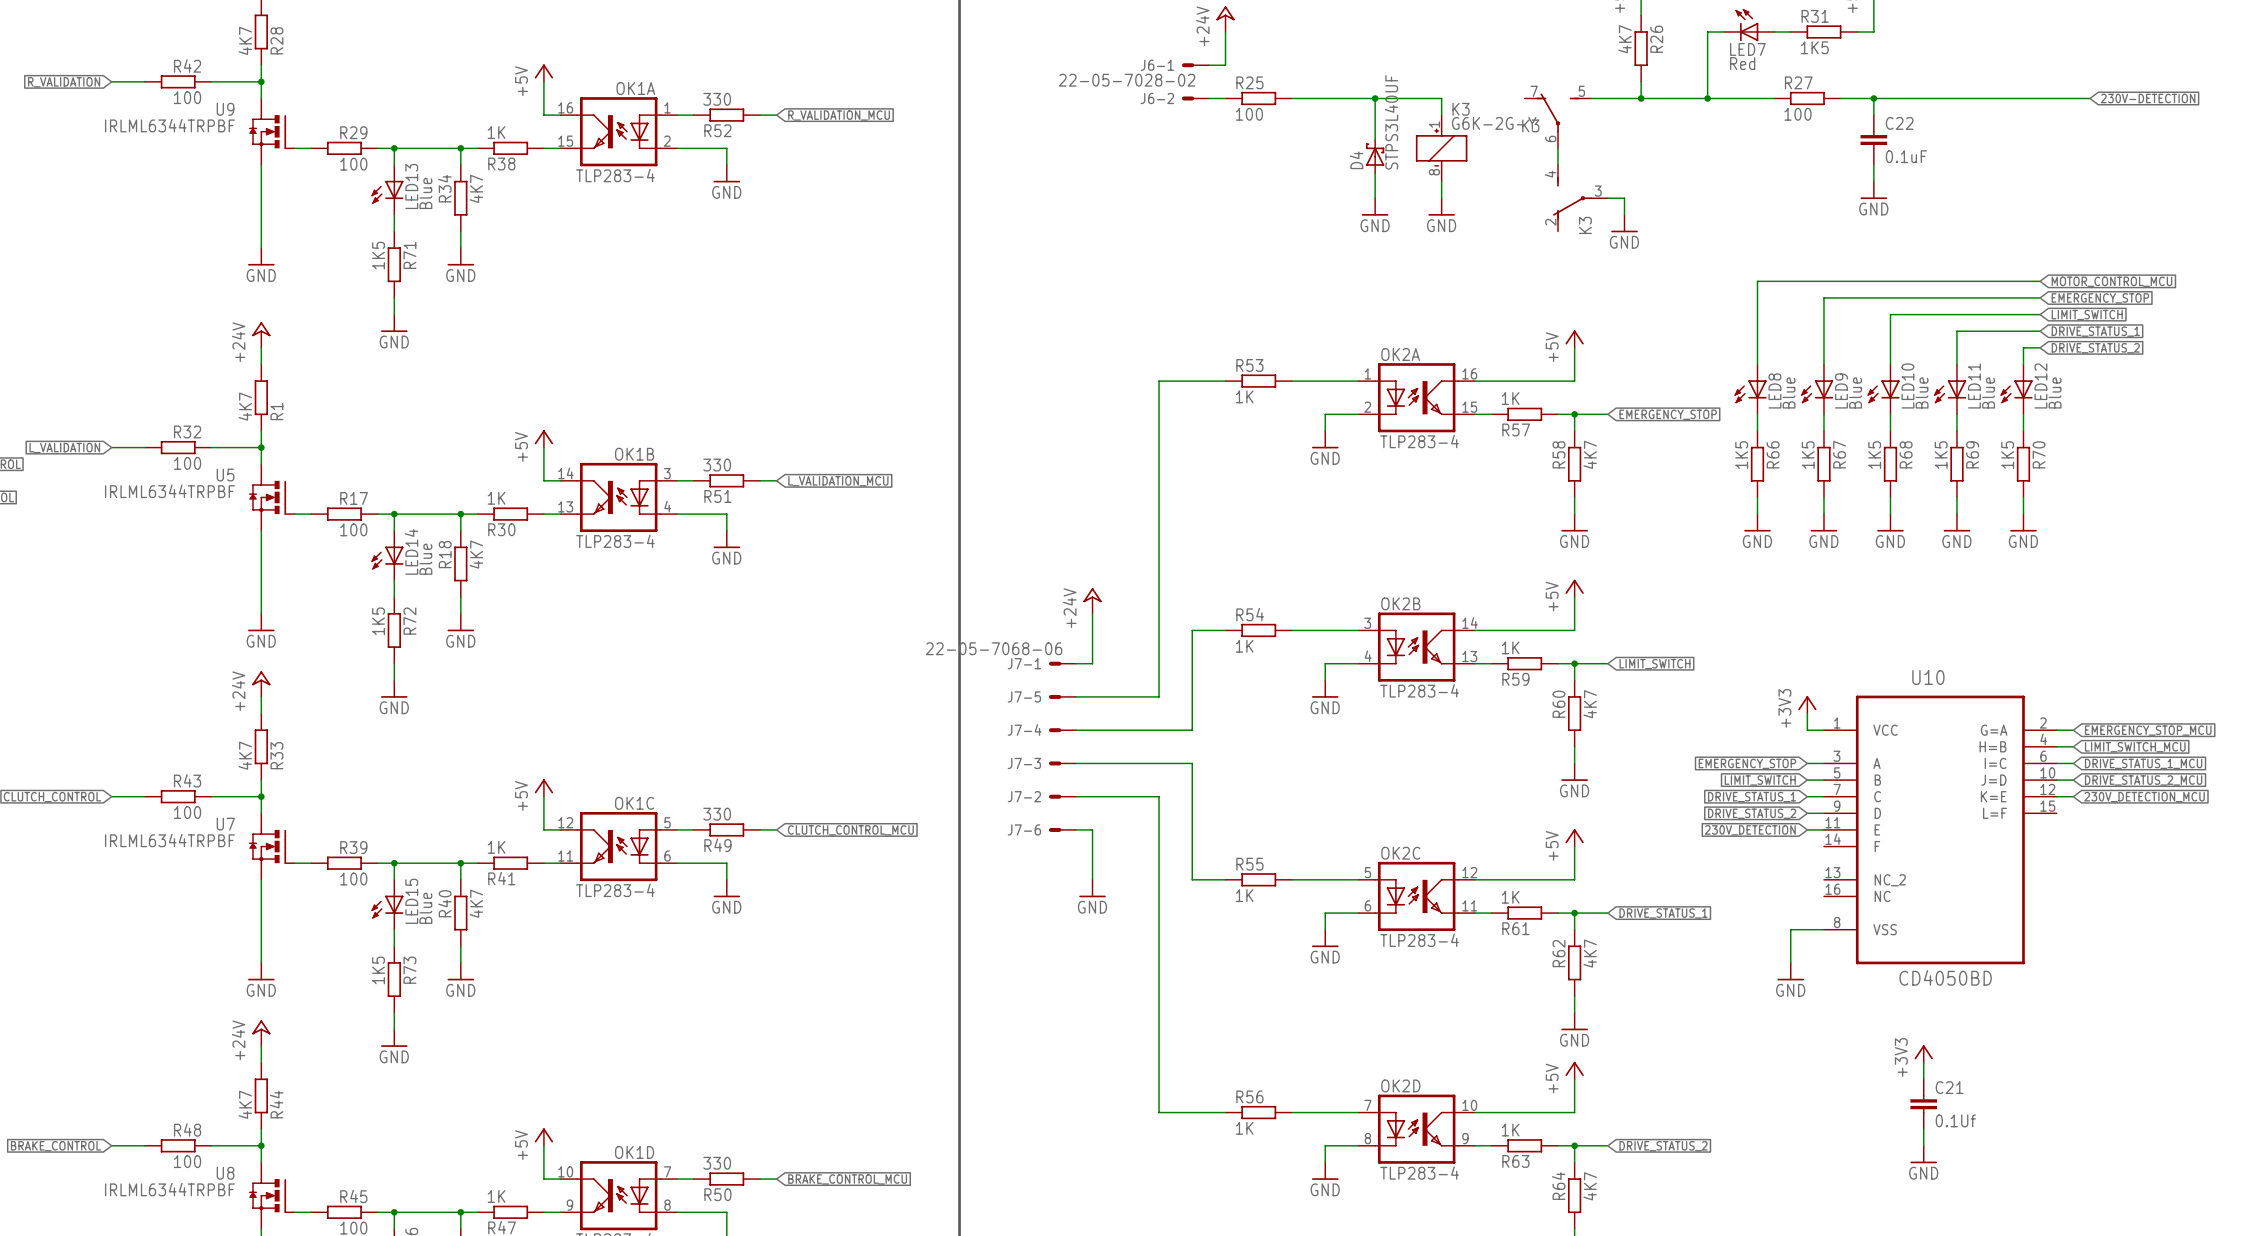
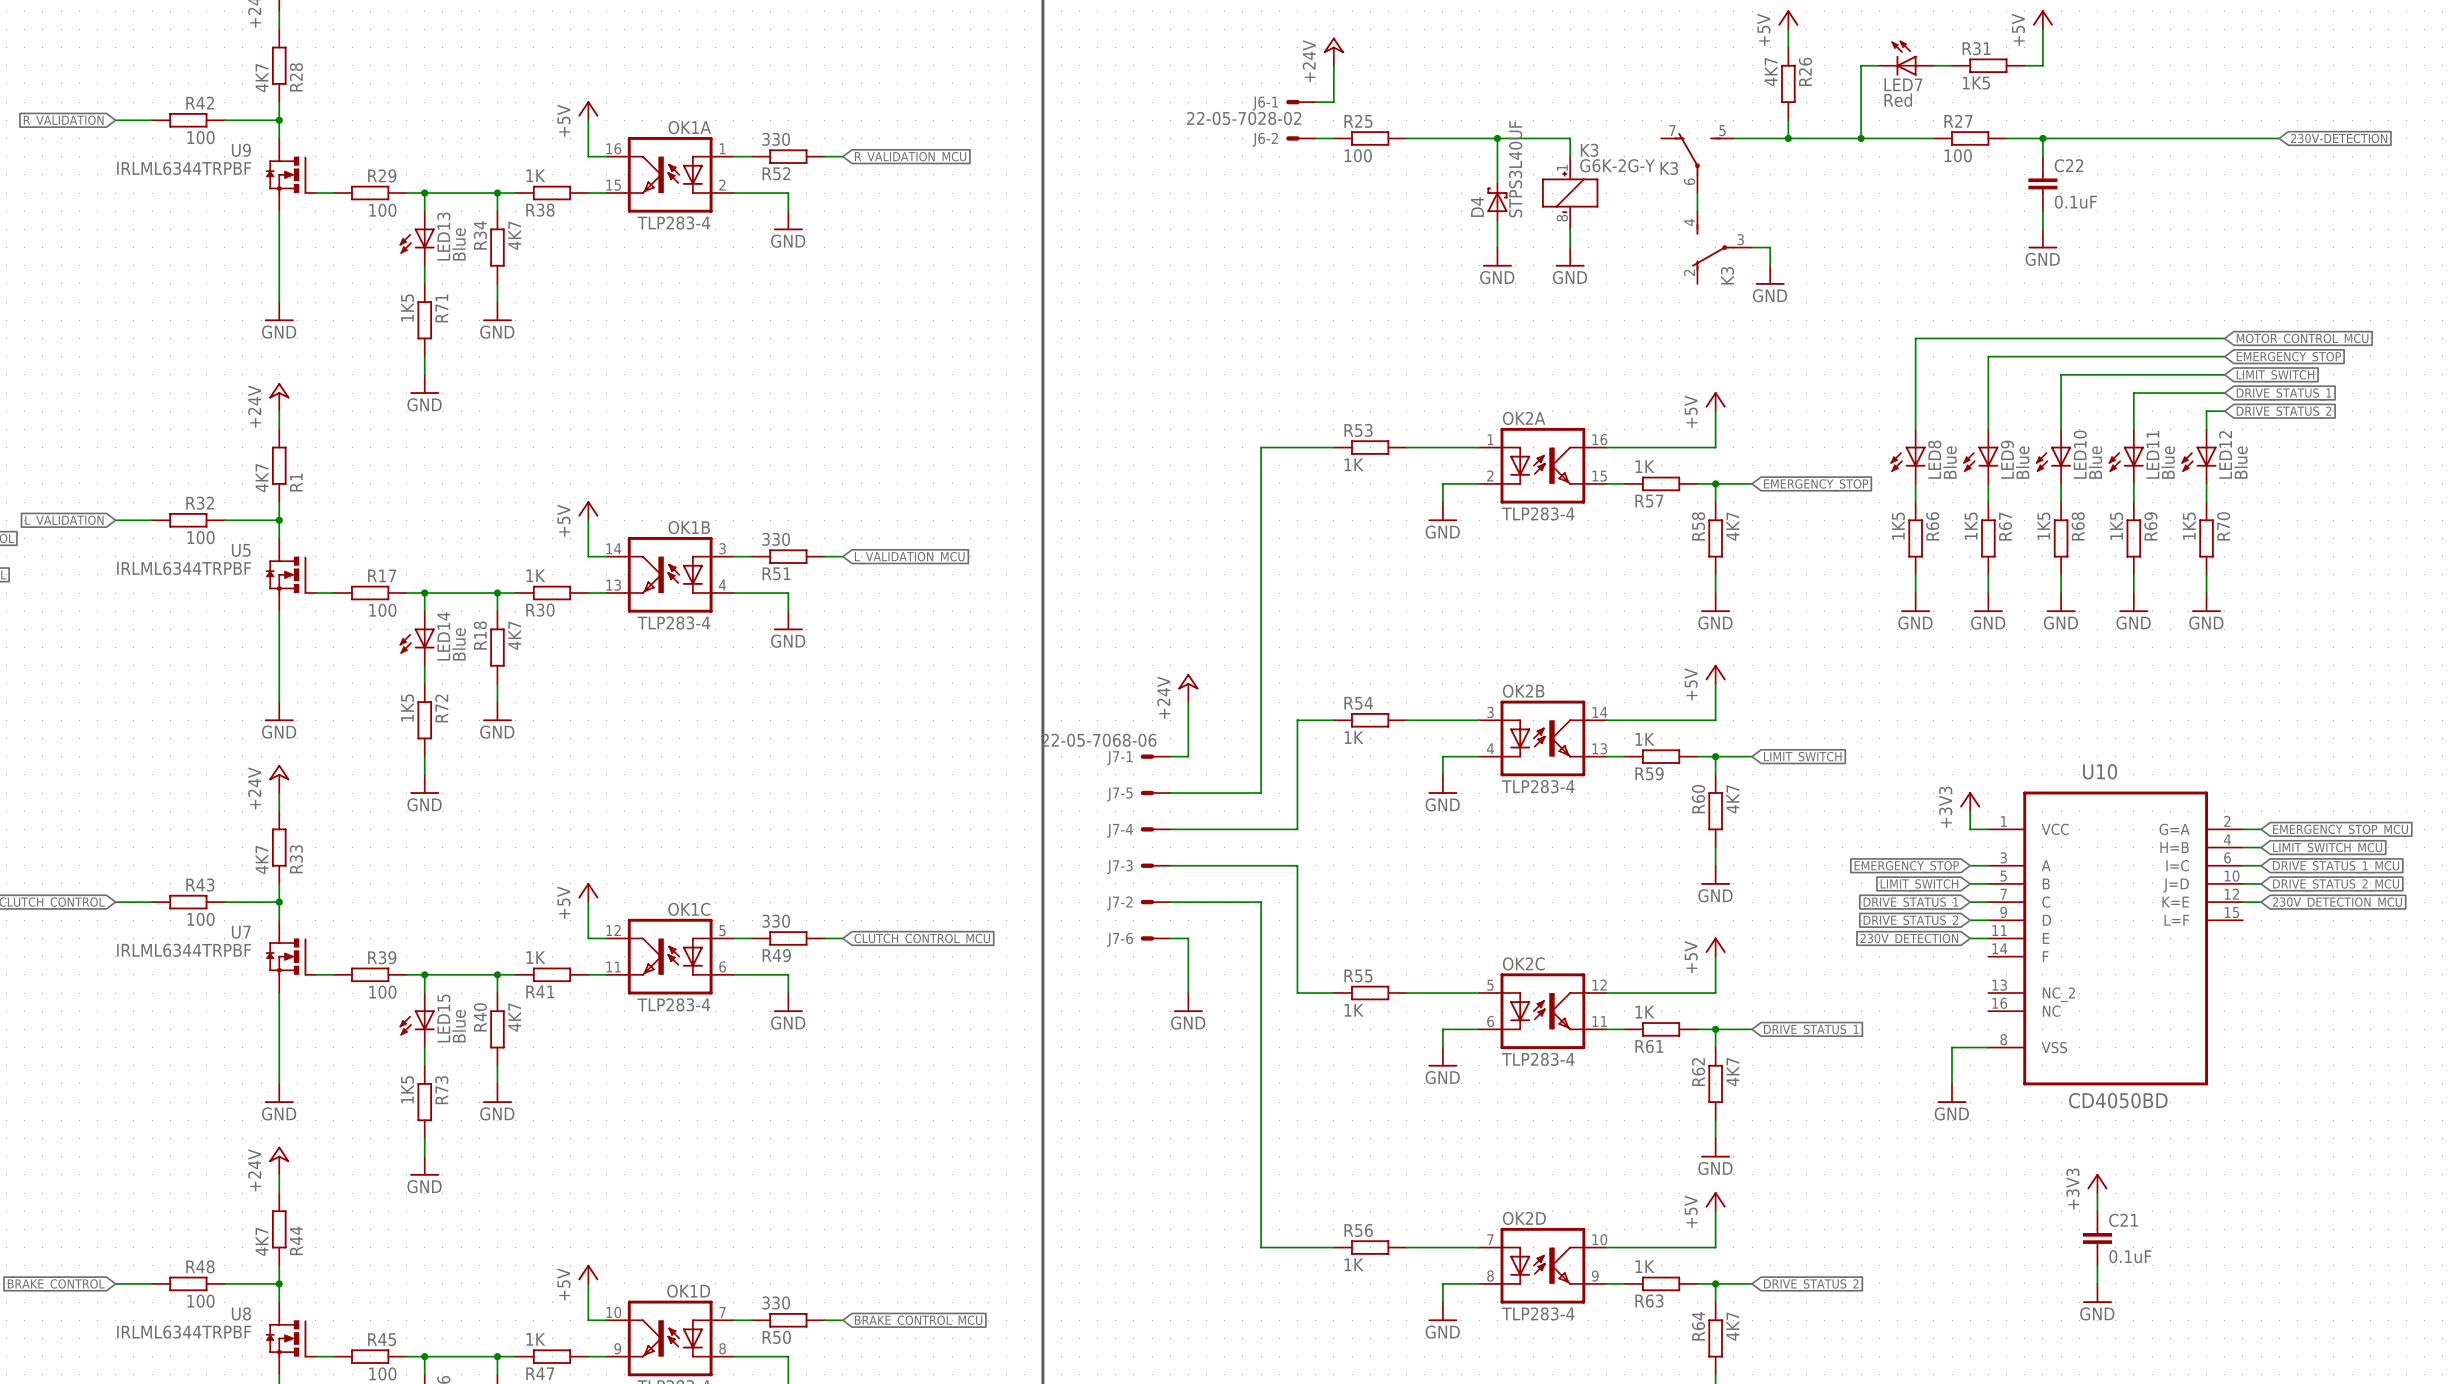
C21 value: 0.1Uf (1955, 1120) -> 0.1uF (2130, 1256)

